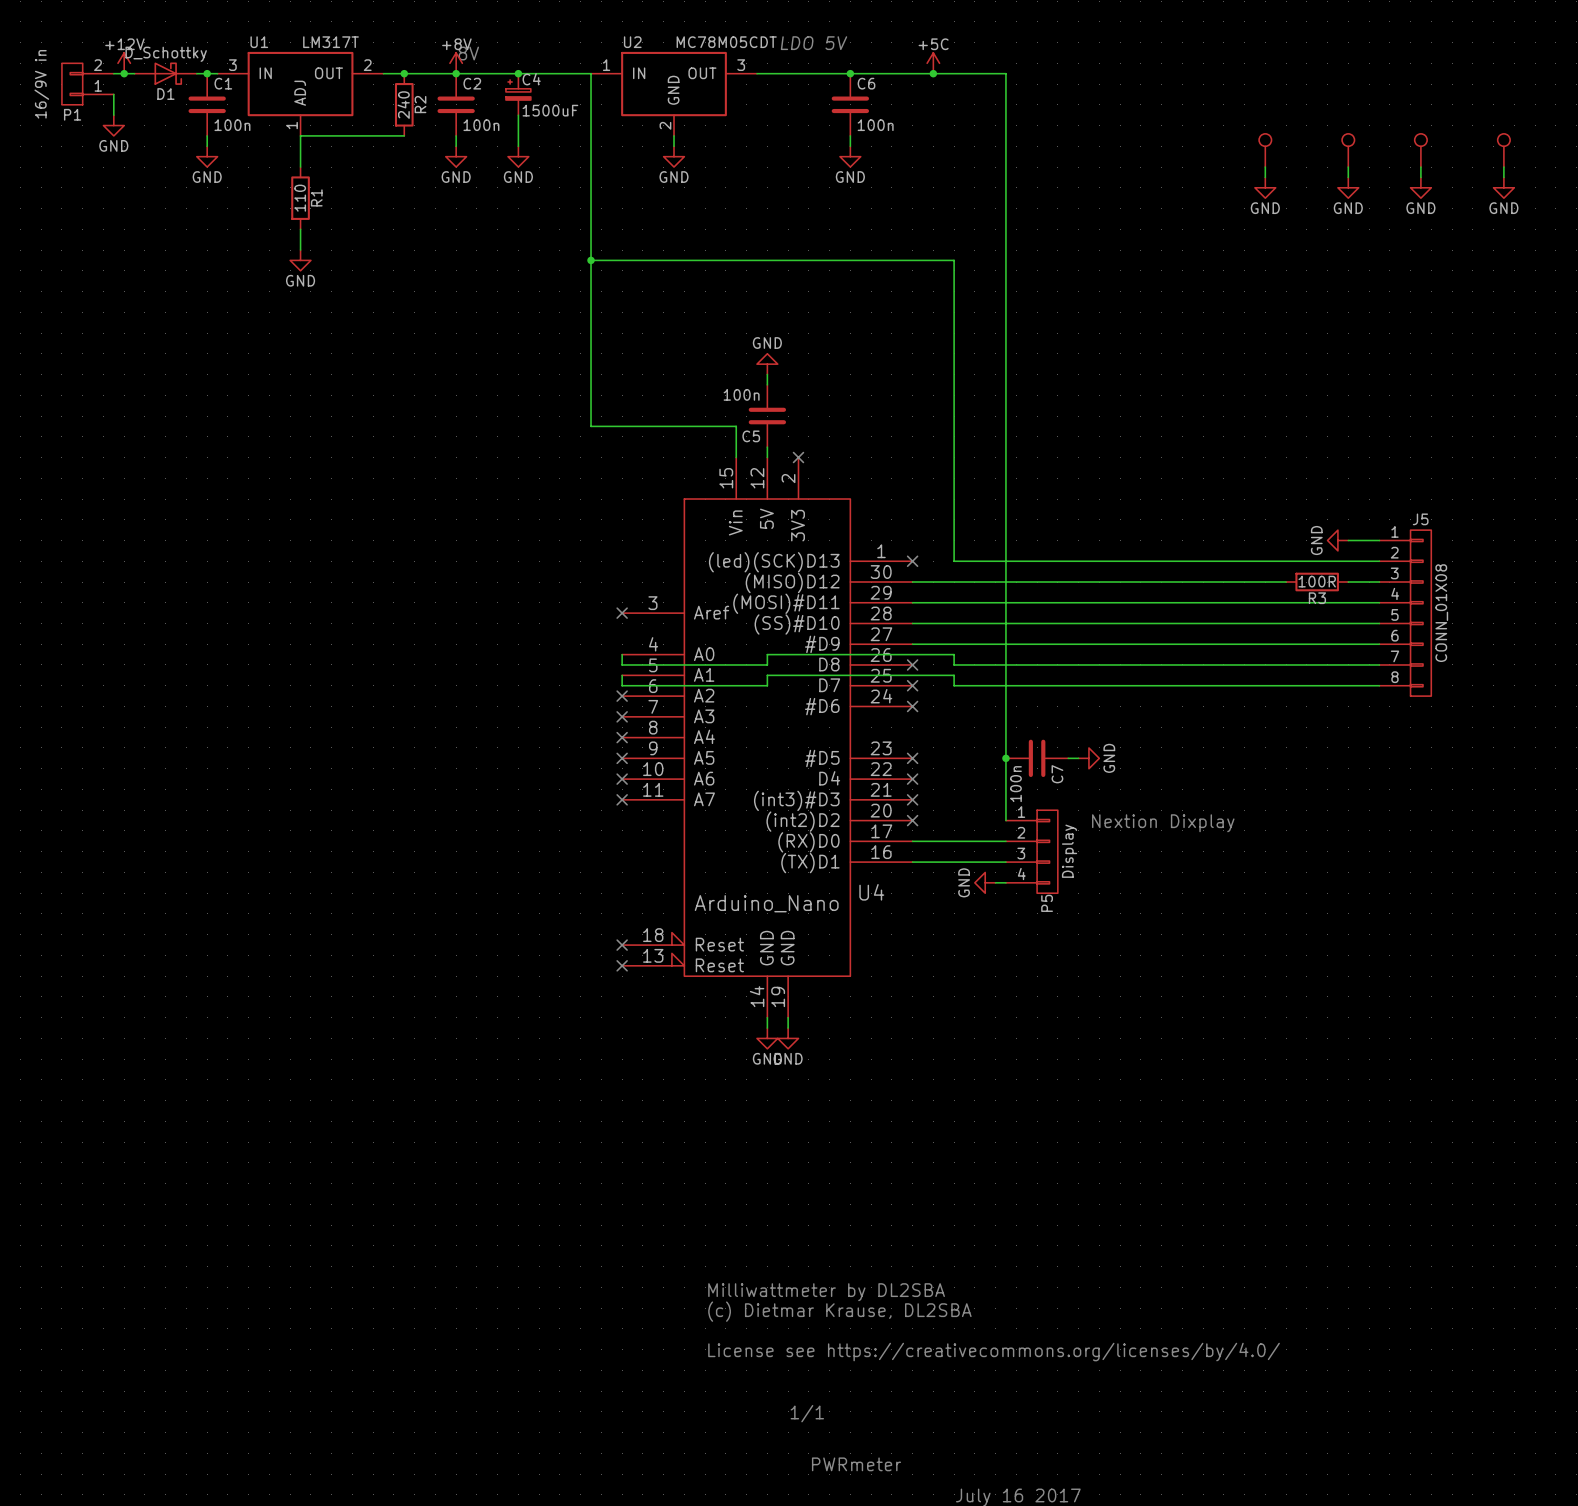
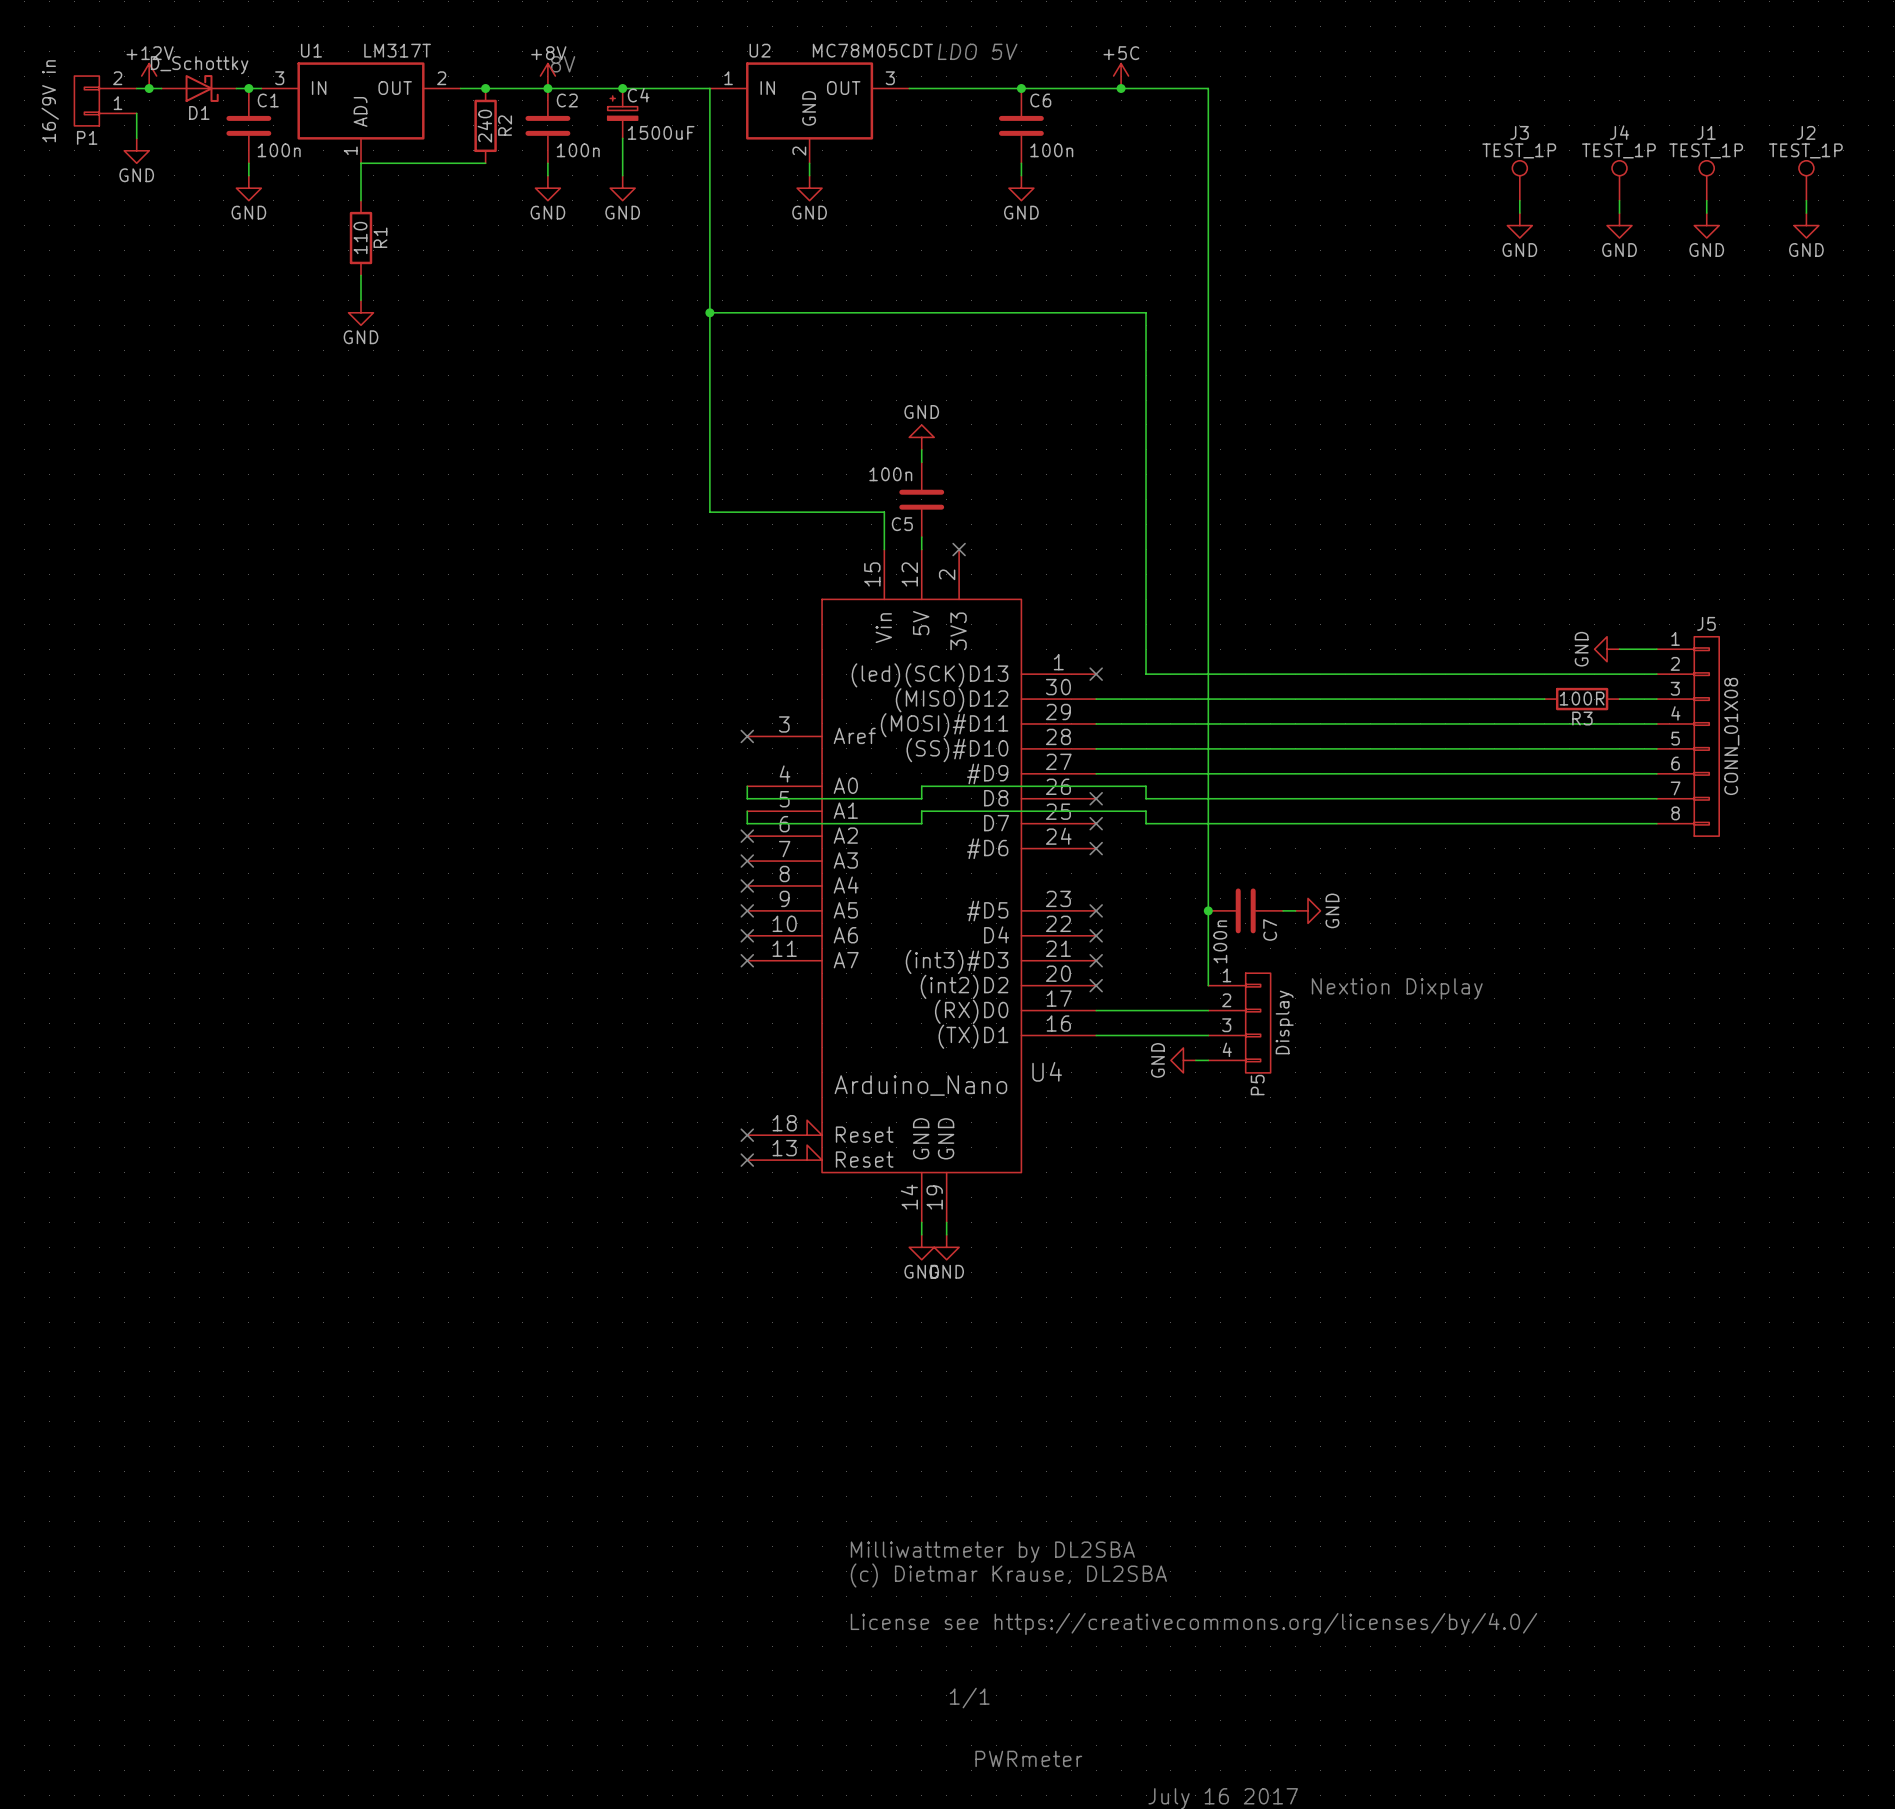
J3 name: none -> J3 (1519, 132)
J4 name: none -> J4 (1619, 132)
J1 name: none -> J1 (1706, 132)
J2 name: none -> J2 (1806, 132)
J3 value: none -> TEST_1P (1519, 150)
J4 value: none -> TEST_1P (1618, 150)
J1 value: none -> TEST_1P (1706, 150)
J2 value: none -> TEST_1P (1805, 150)

